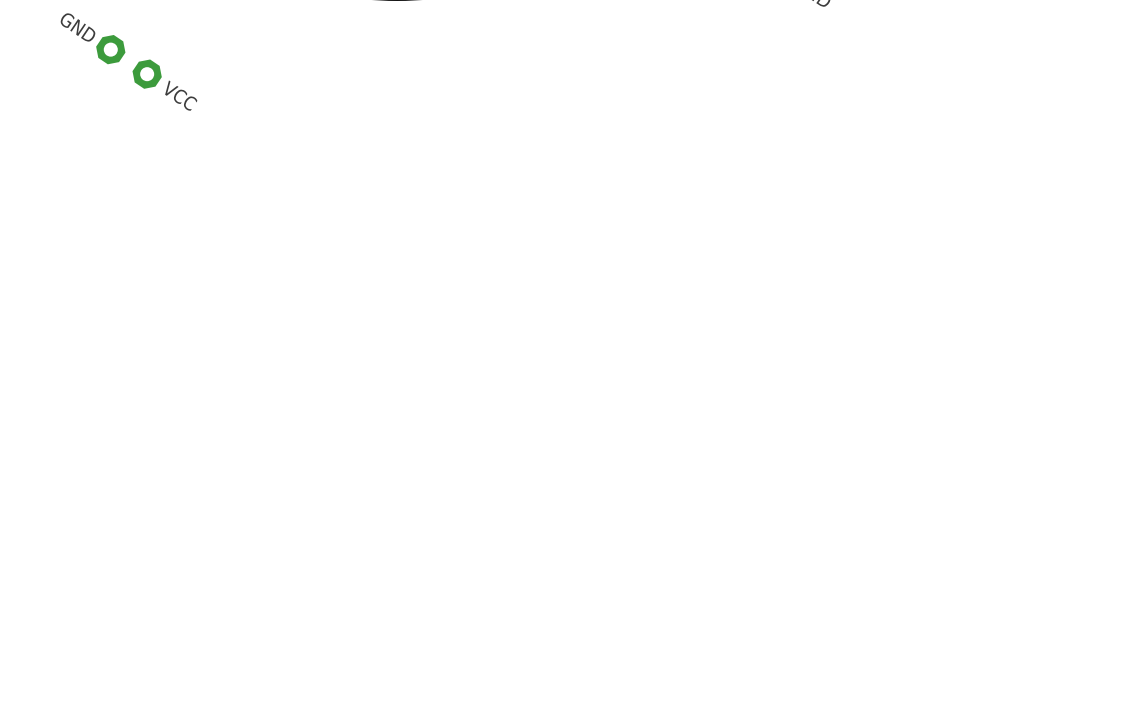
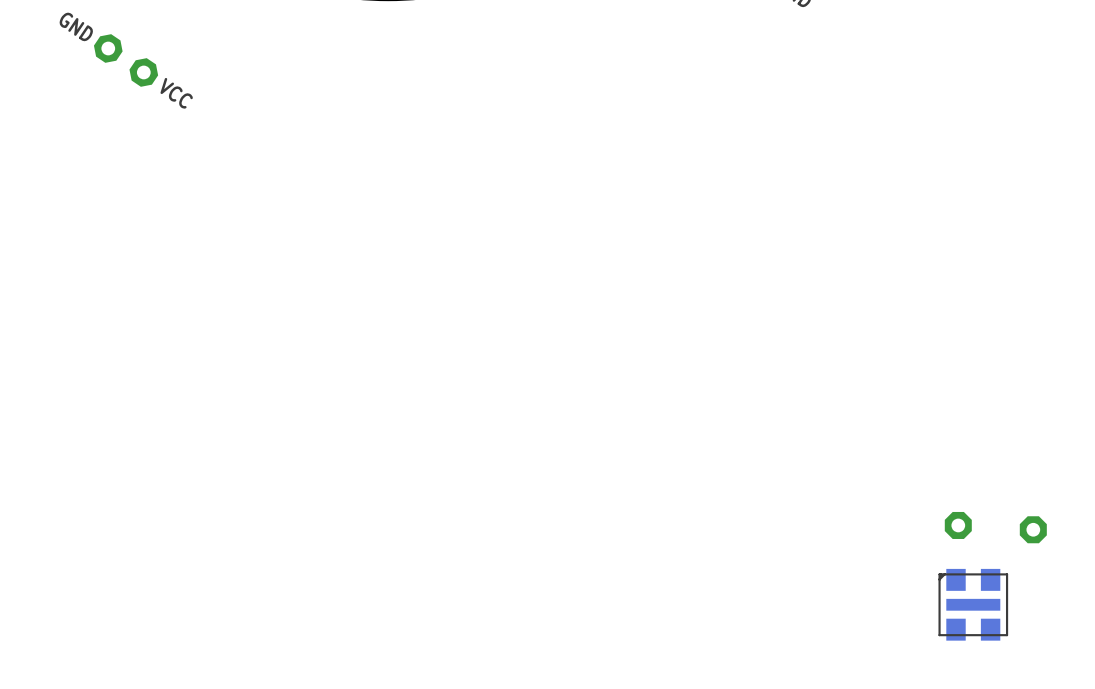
part: none -> (958, 525)
part: none -> (1033, 529)
part: none -> (973, 604)

